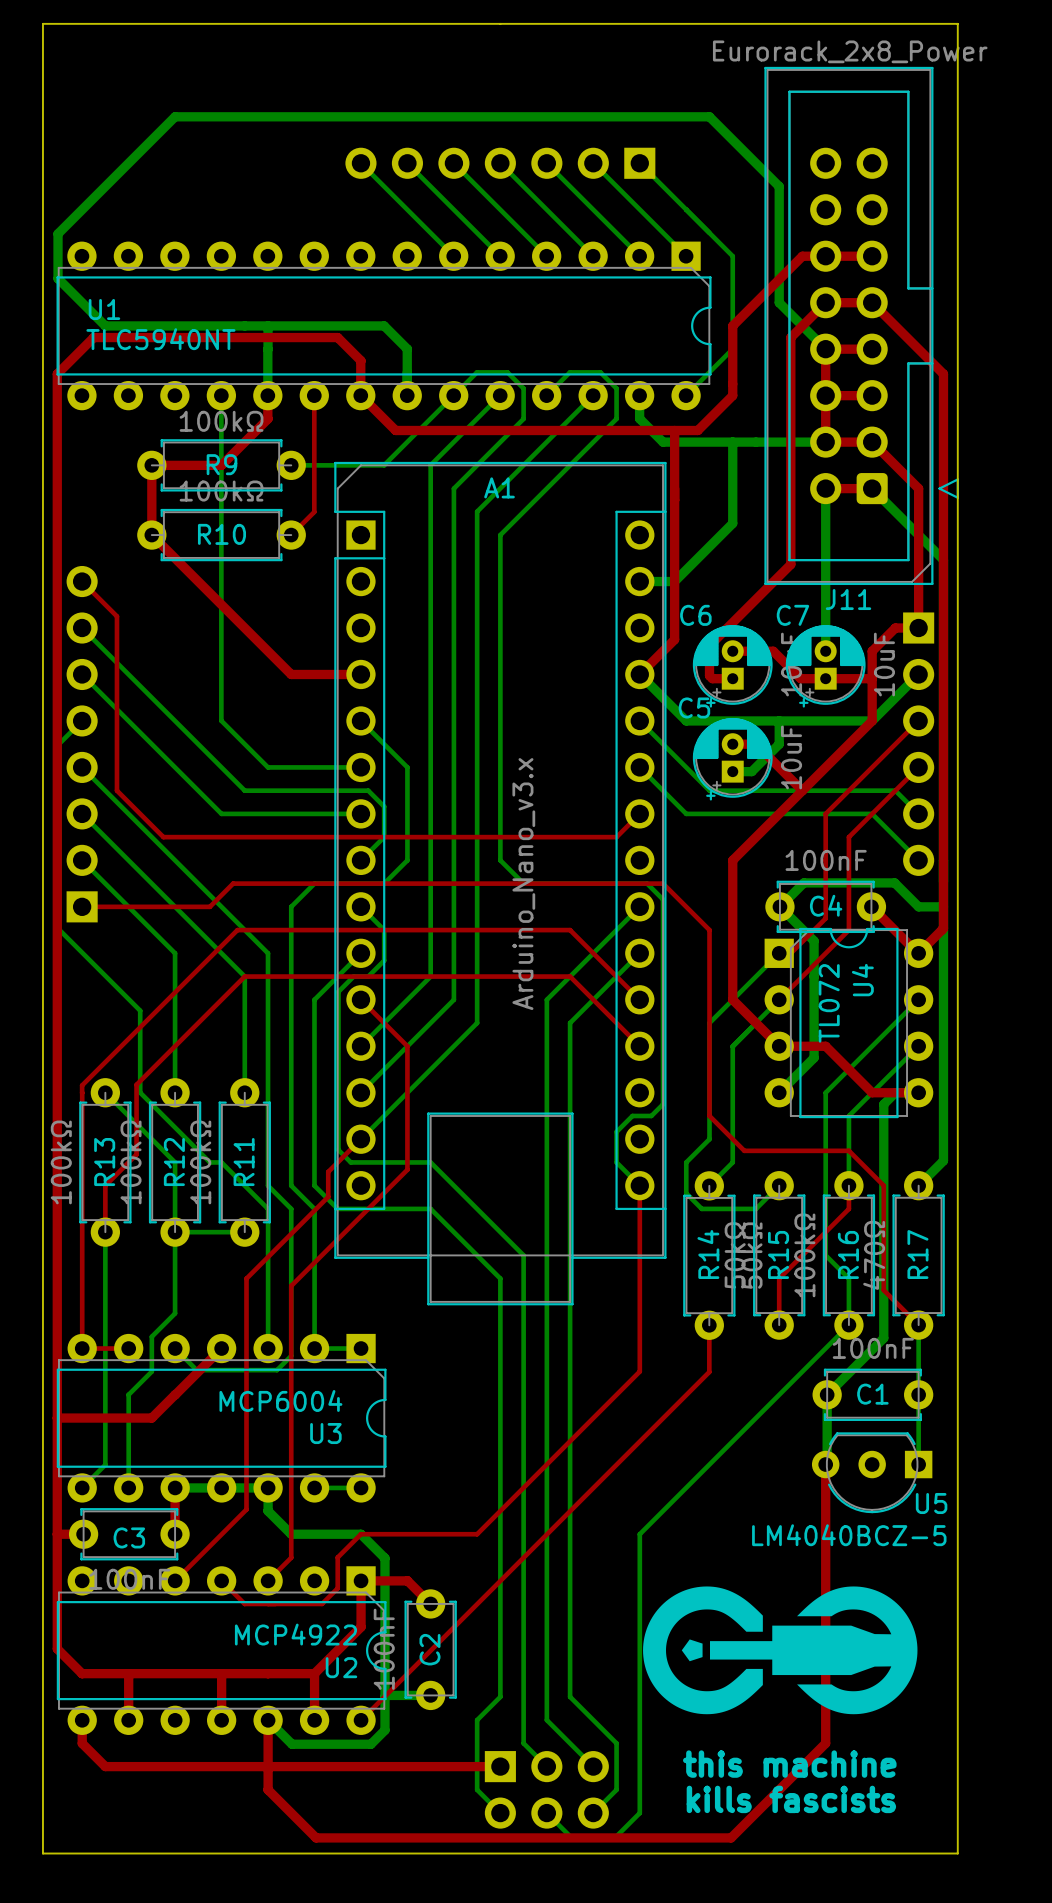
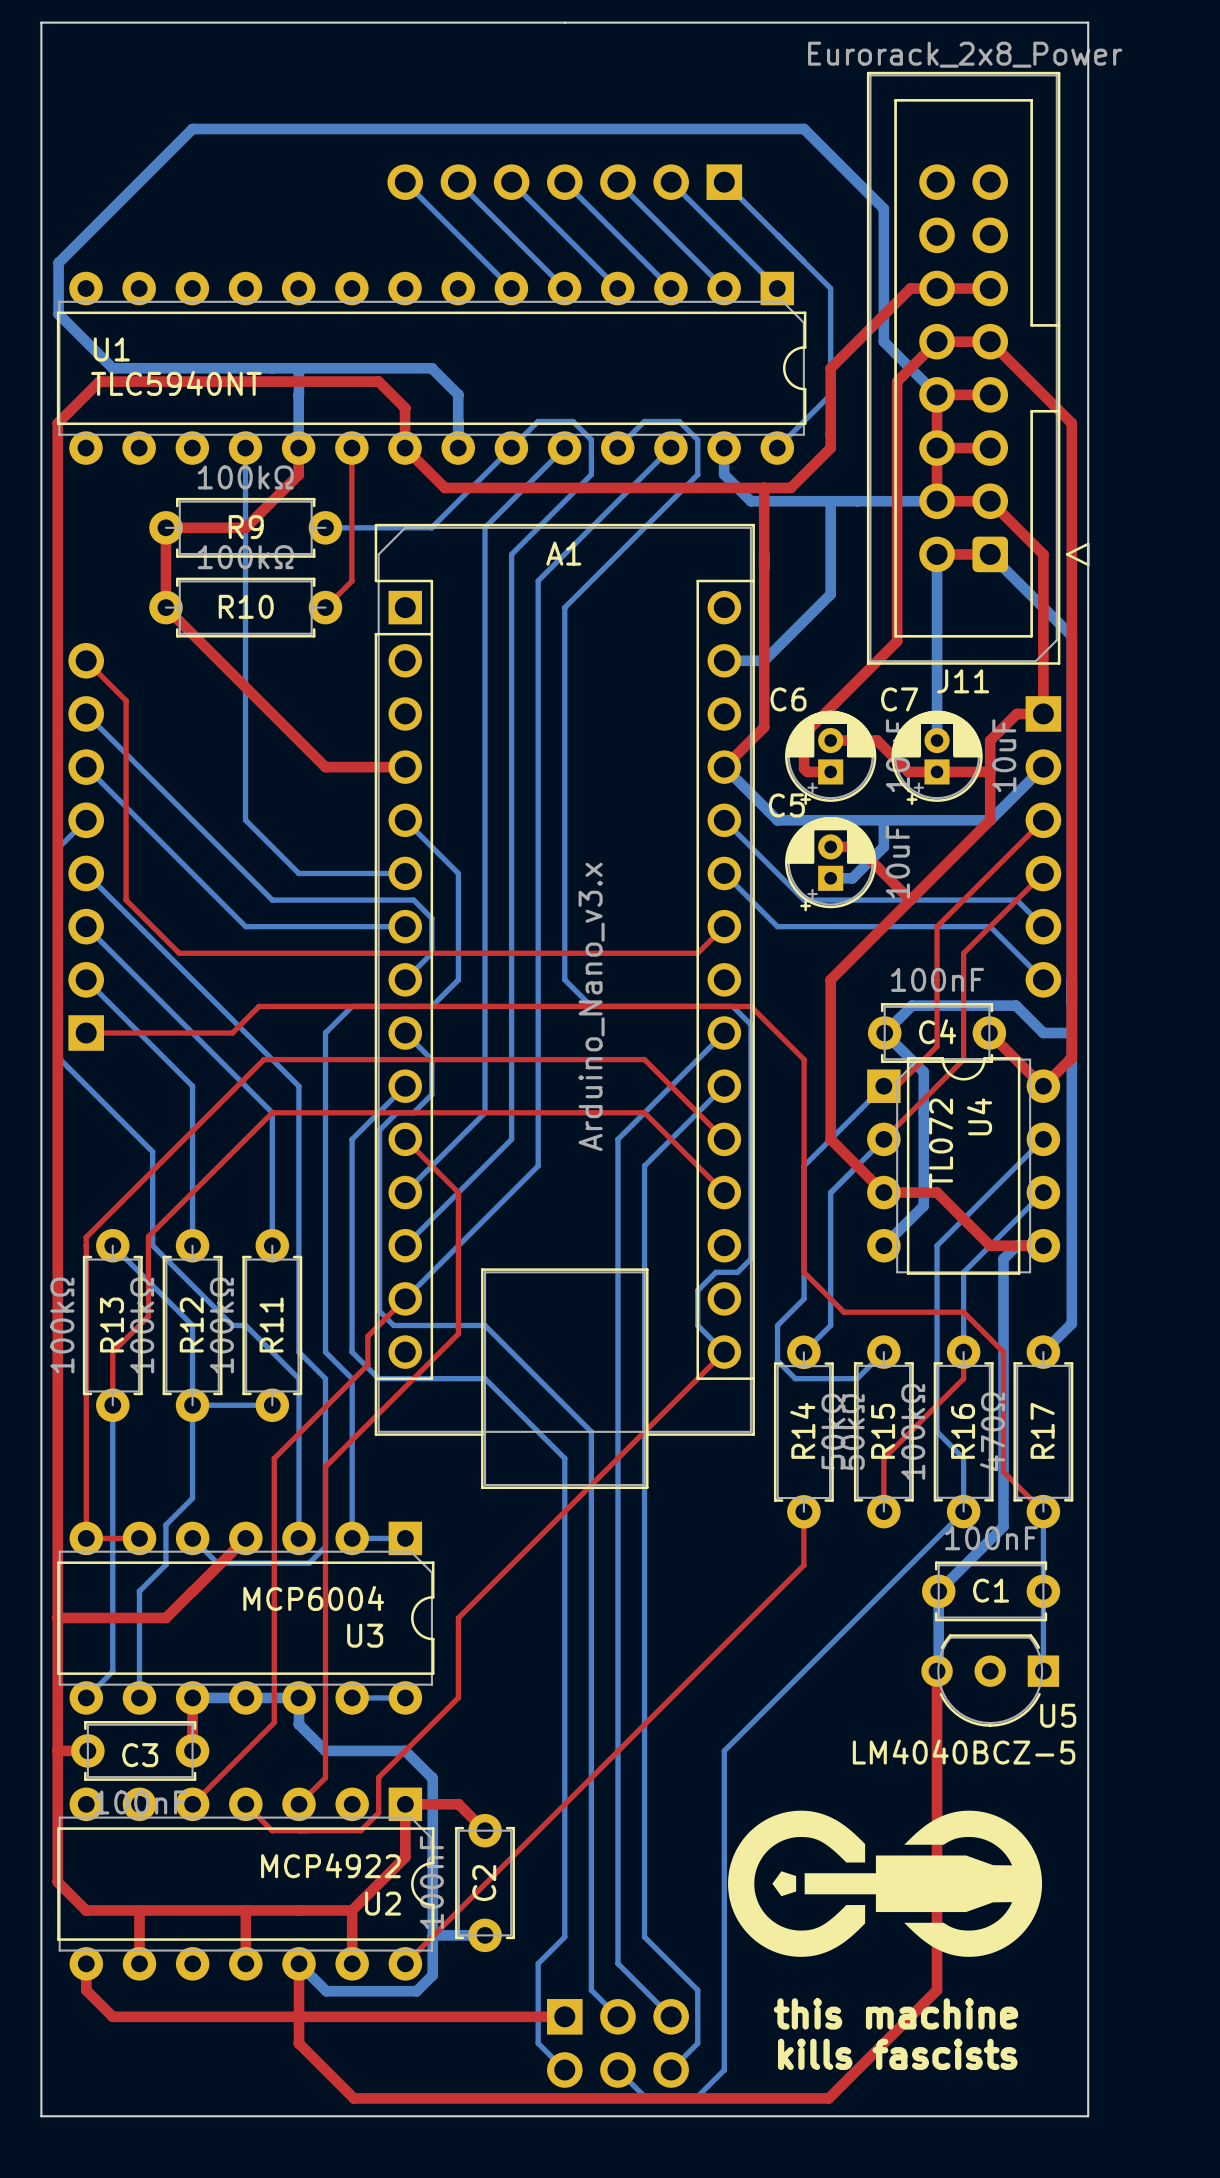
top track: (639, 1185) (639, 1371) (477, 1534) (360, 1534) -> (724, 1352) (458, 1617) (458, 1697) (405, 1750)

